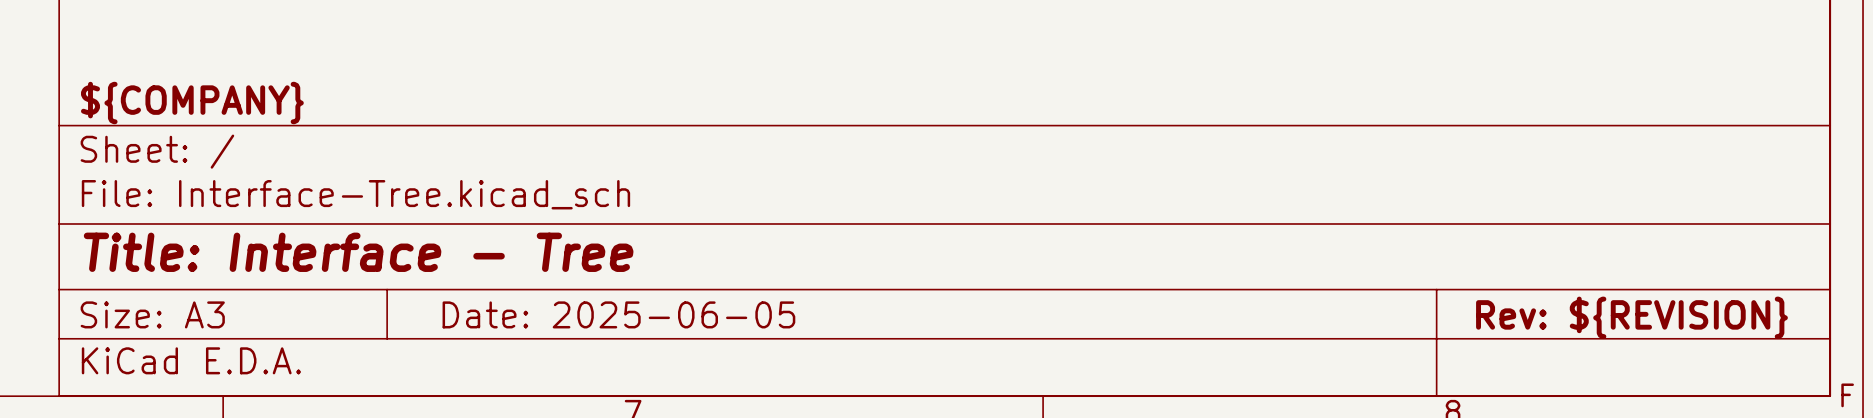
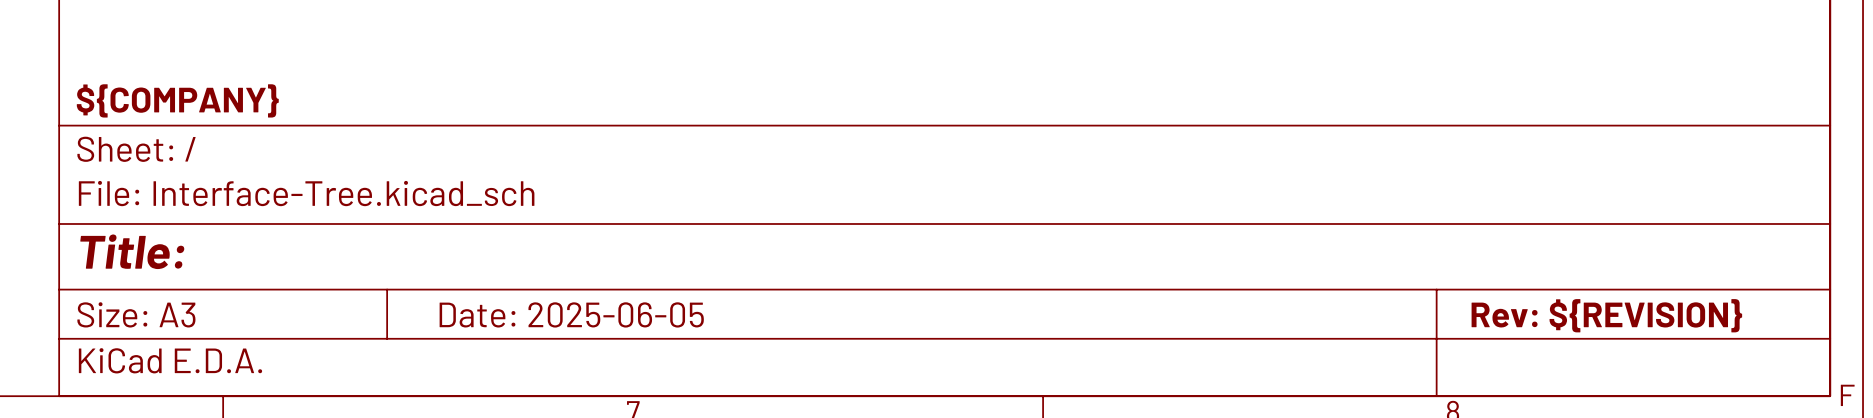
title block: Title: Interface - Tree (358, 252) -> Title: (132, 251)

